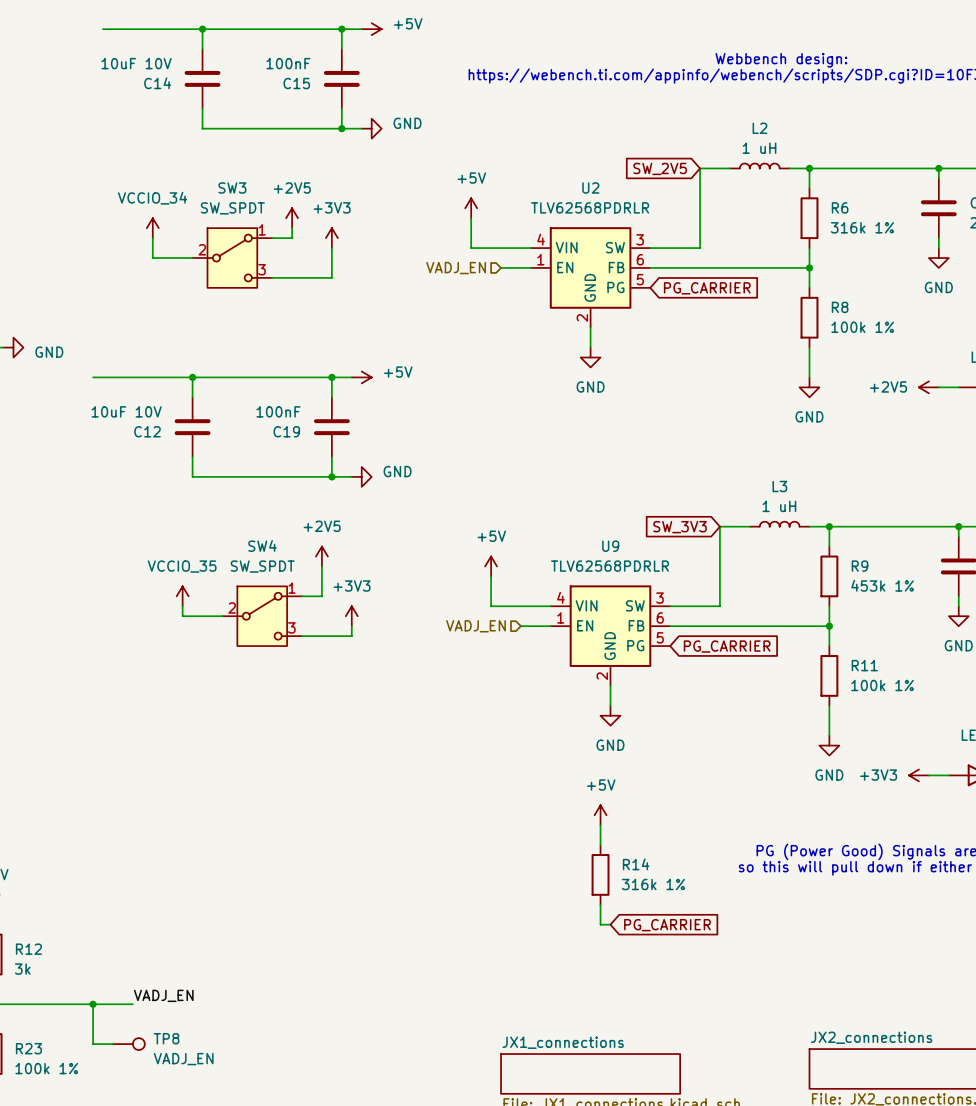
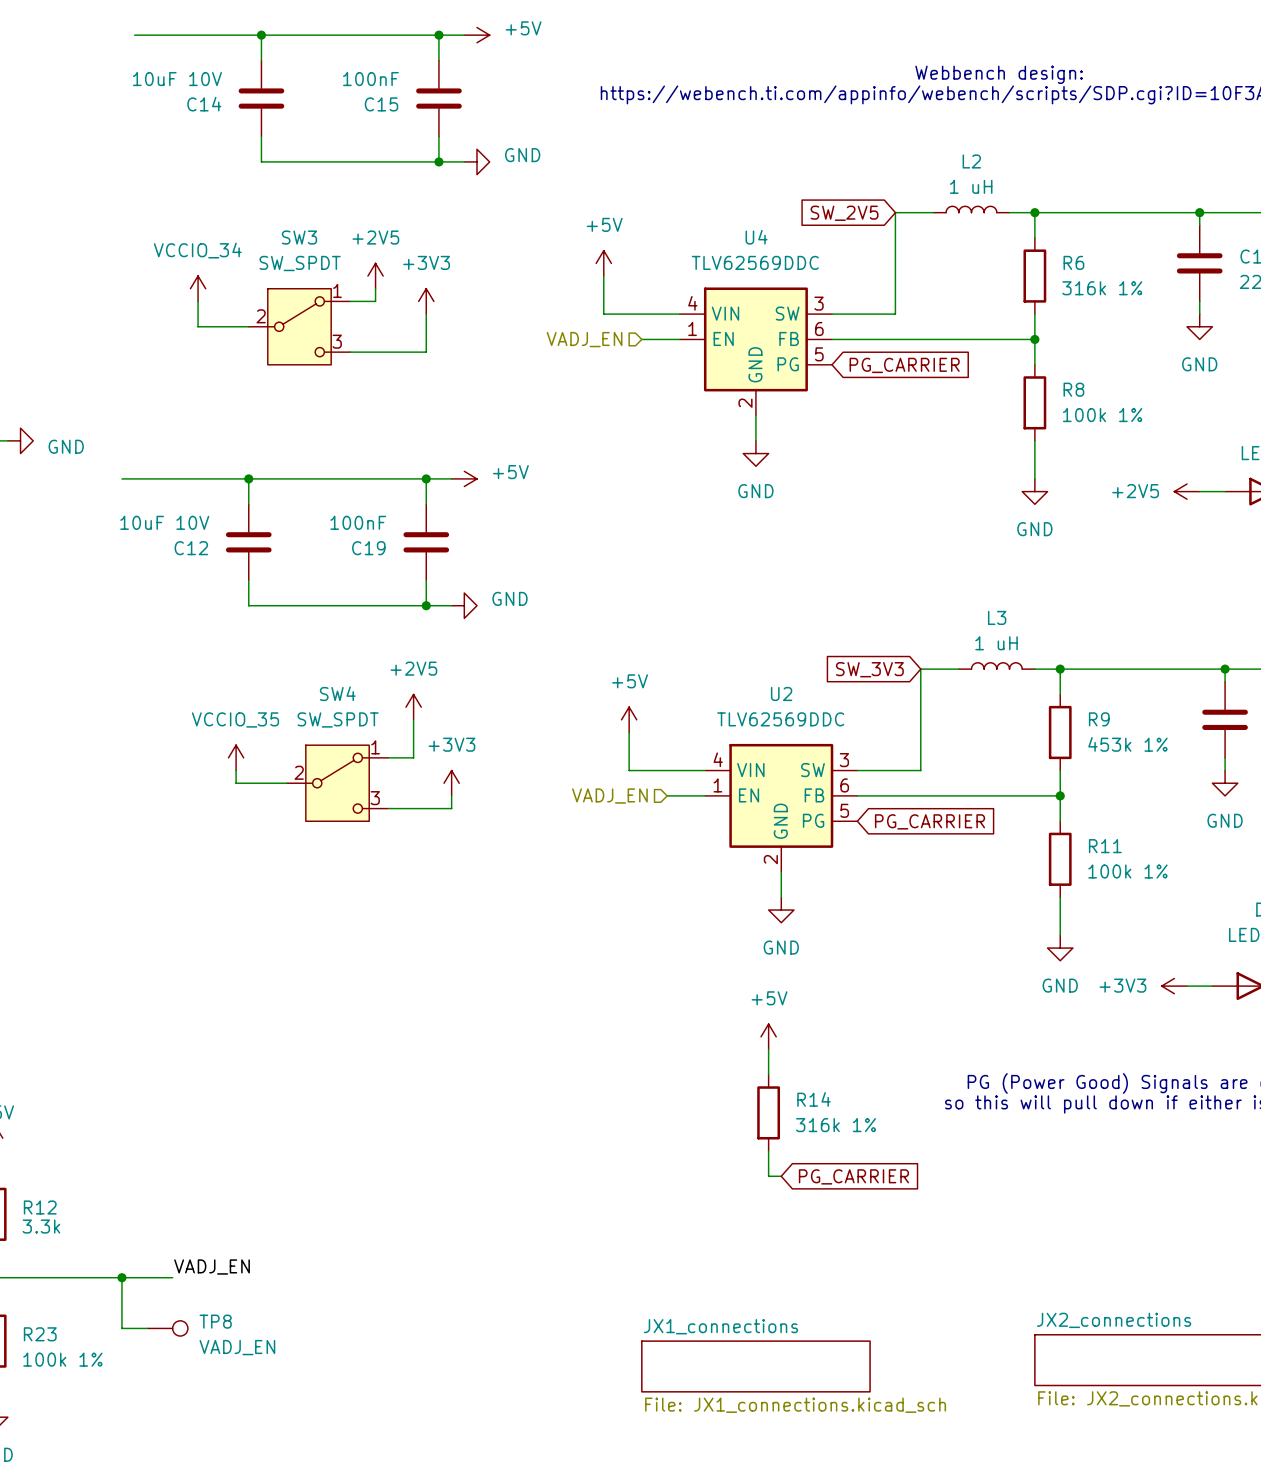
U2 name: U2 (590, 187) -> U4 (756, 237)
U2 value: TLV62568PDRLR (590, 207) -> TLV62569DDC (755, 262)
U9 name: U9 (610, 546) -> U2 (781, 694)
U9 value: TLV62568PDRLR (610, 566) -> TLV62569DDC (780, 719)
R12 value: 3k (22, 969) -> 3.3k (41, 1226)

